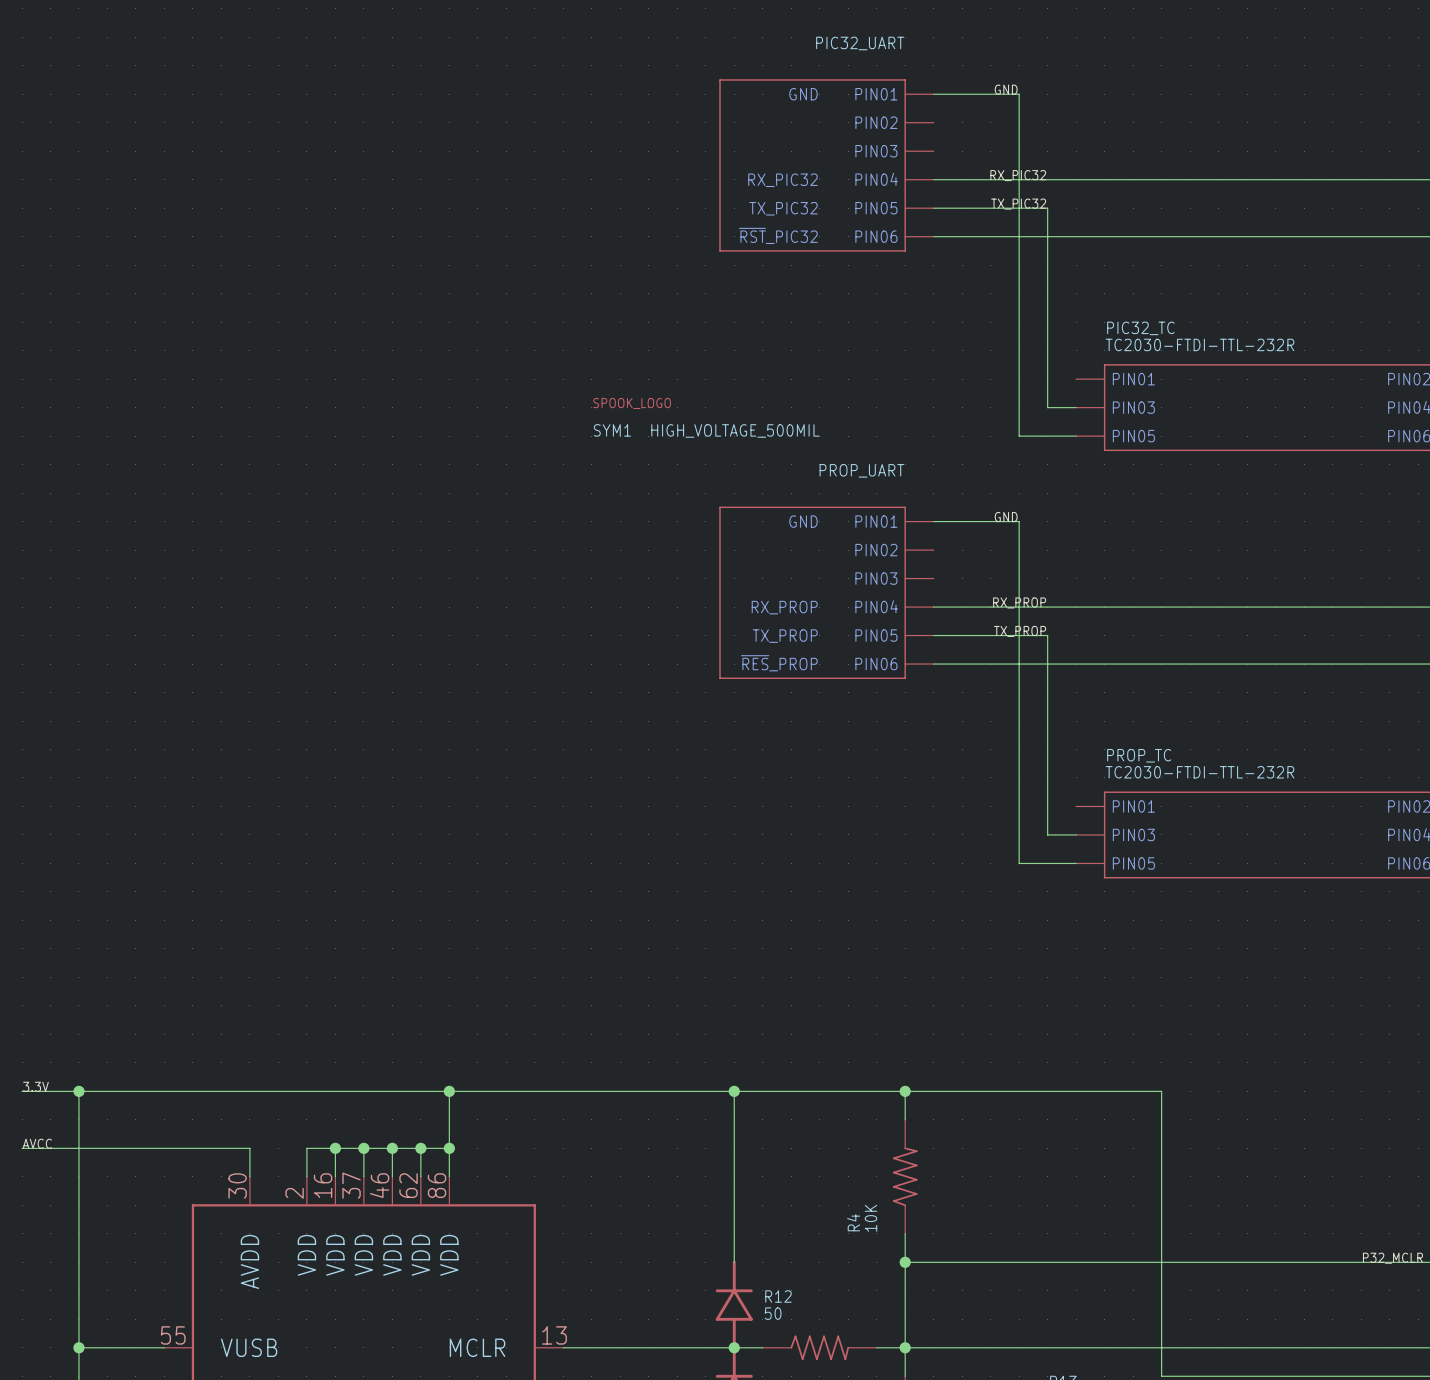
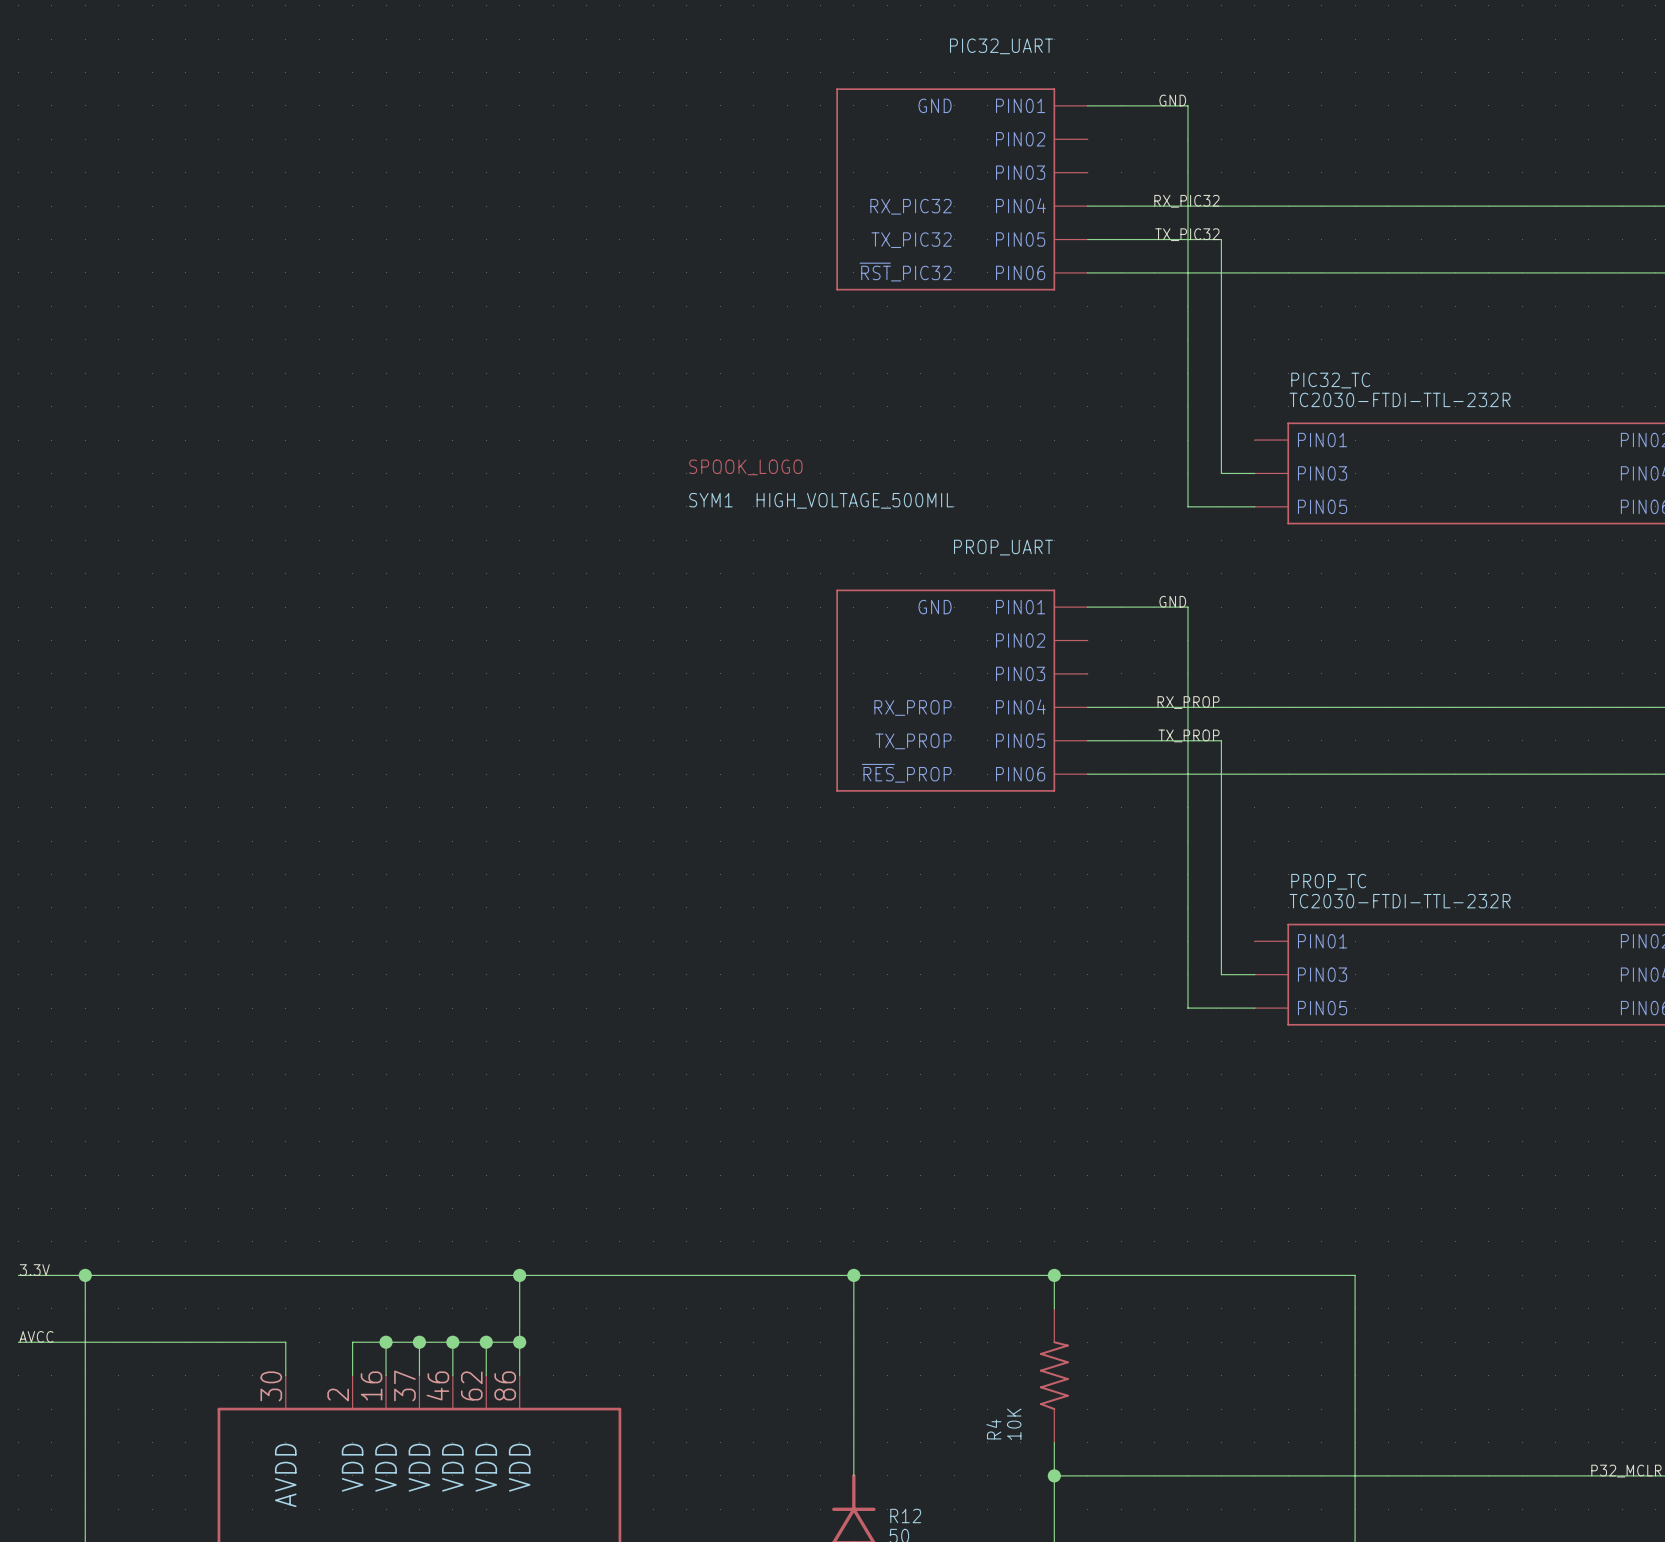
part: none -> (745, 467)
part: (632, 403) -> none

